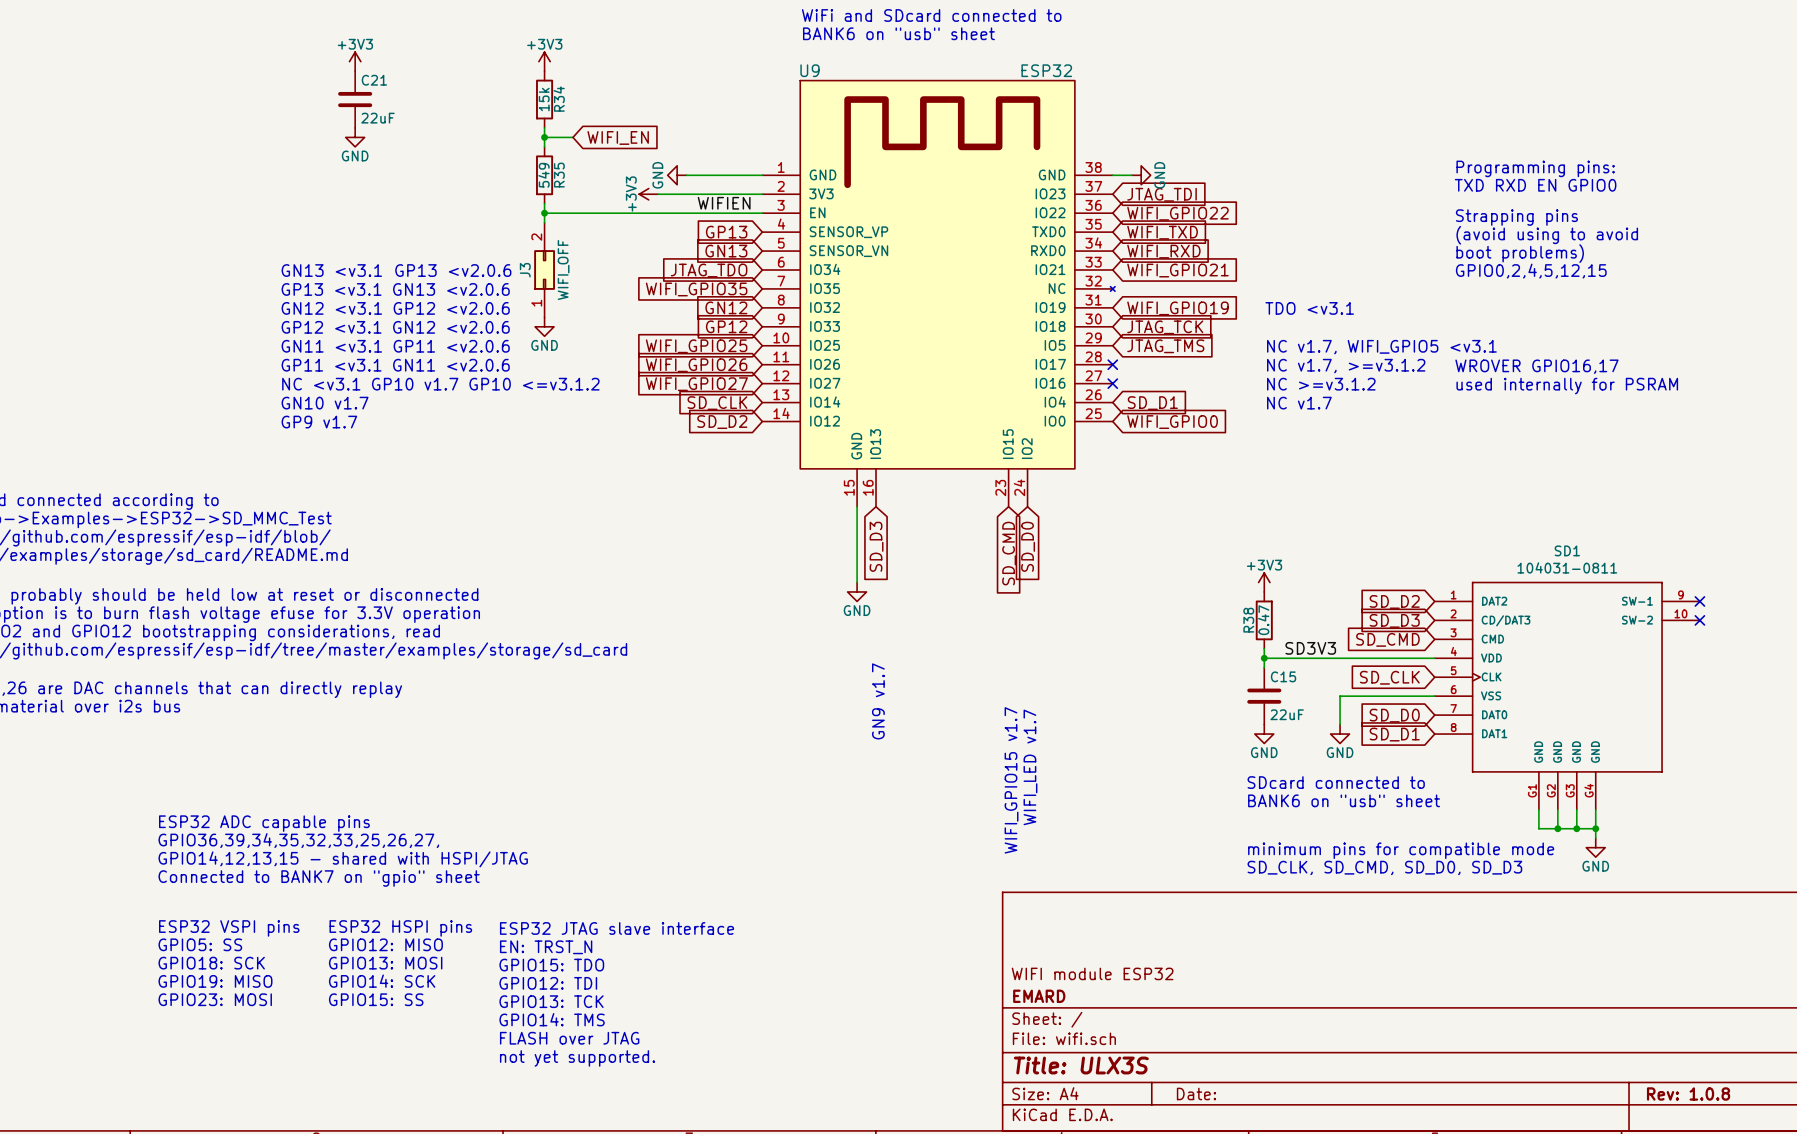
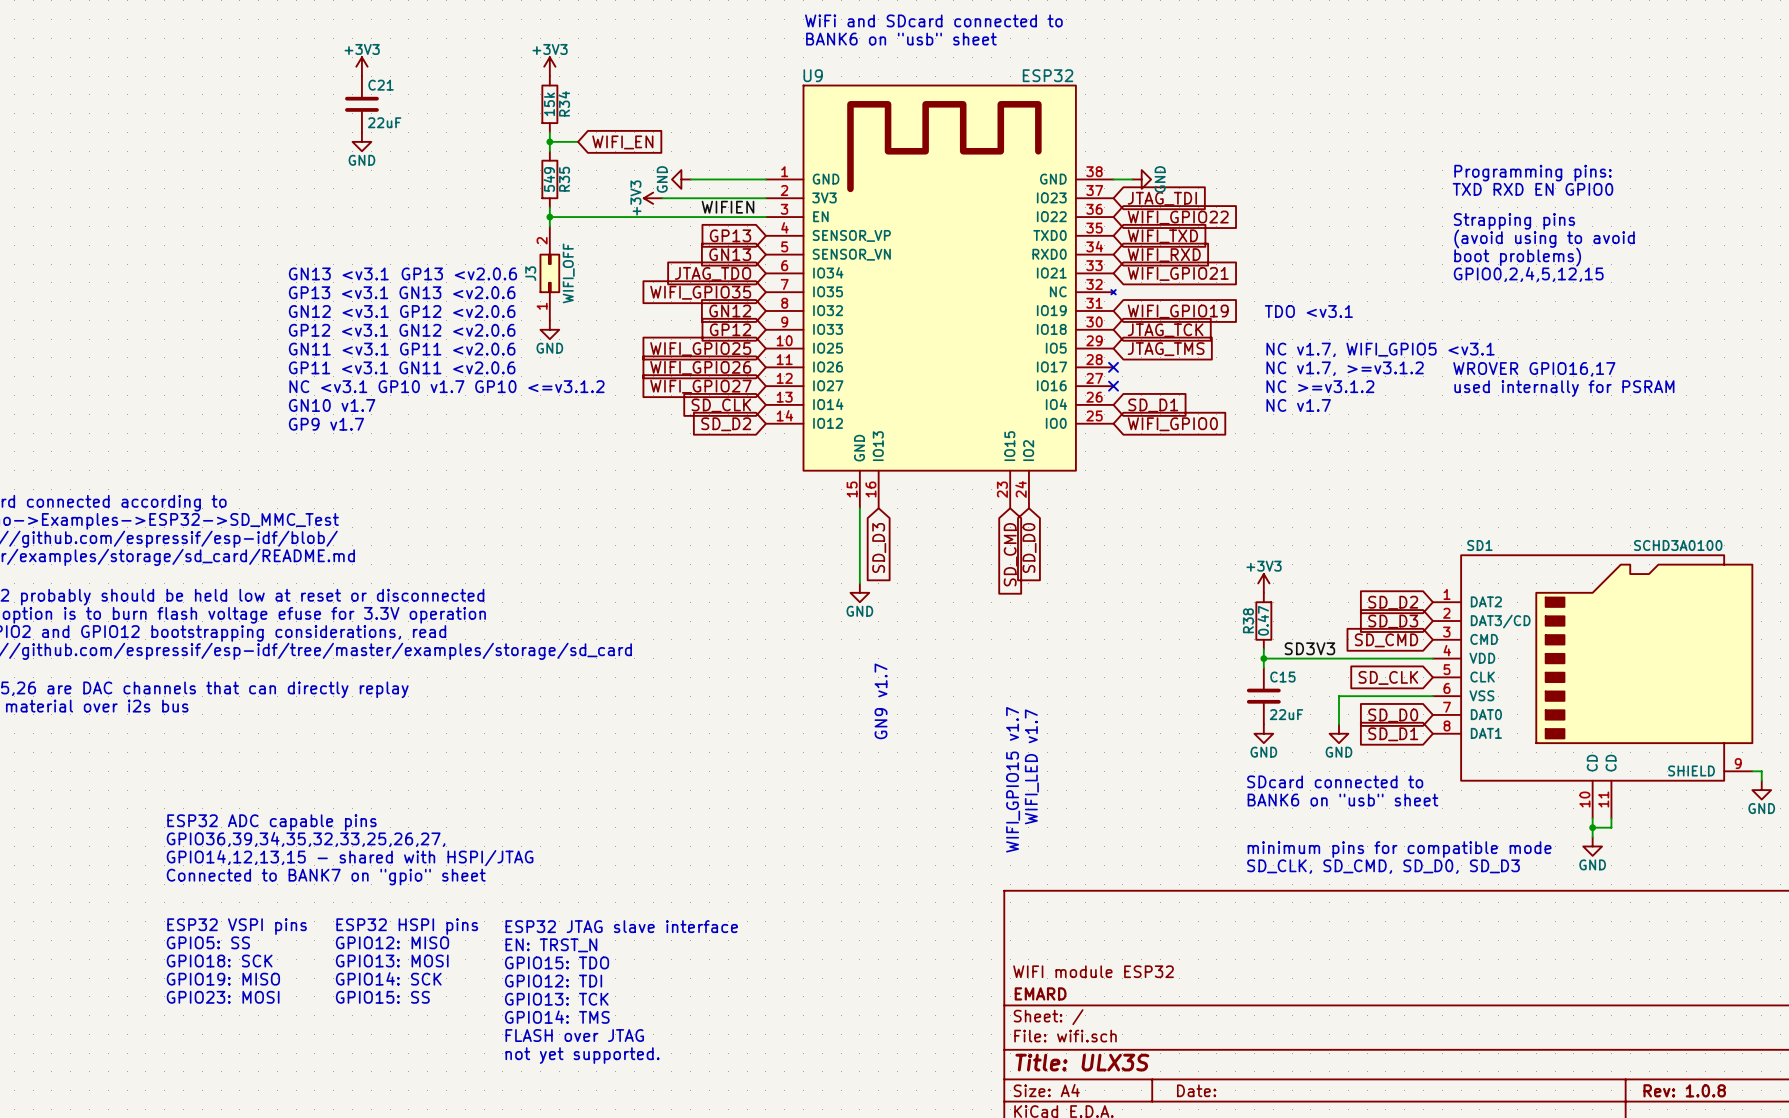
SD1 name position: SD1 (1567, 550) -> SD1 (1479, 545)
SD1 value: 104031-0811 (1567, 567) -> SCHD3A0100 (1678, 545)
SD1 symbol: [1434, 581, 1700, 810] -> [1432, 554, 1754, 819]
no-connect mark: (1699, 601) -> none
no-connect mark: (1699, 620) -> none
wire: none -> (1752, 771) (1761, 771) (1761, 780)
power symbol: none -> GND (1761, 790)
wire: (1538, 809) (1538, 828) (1595, 828) -> (1611, 818) (1611, 827) (1592, 827)
wire: (1557, 809) (1557, 828) -> none
wire: (1576, 809) (1576, 828) -> none
junction: (1557, 828) -> none
junction: (1576, 828) -> none

